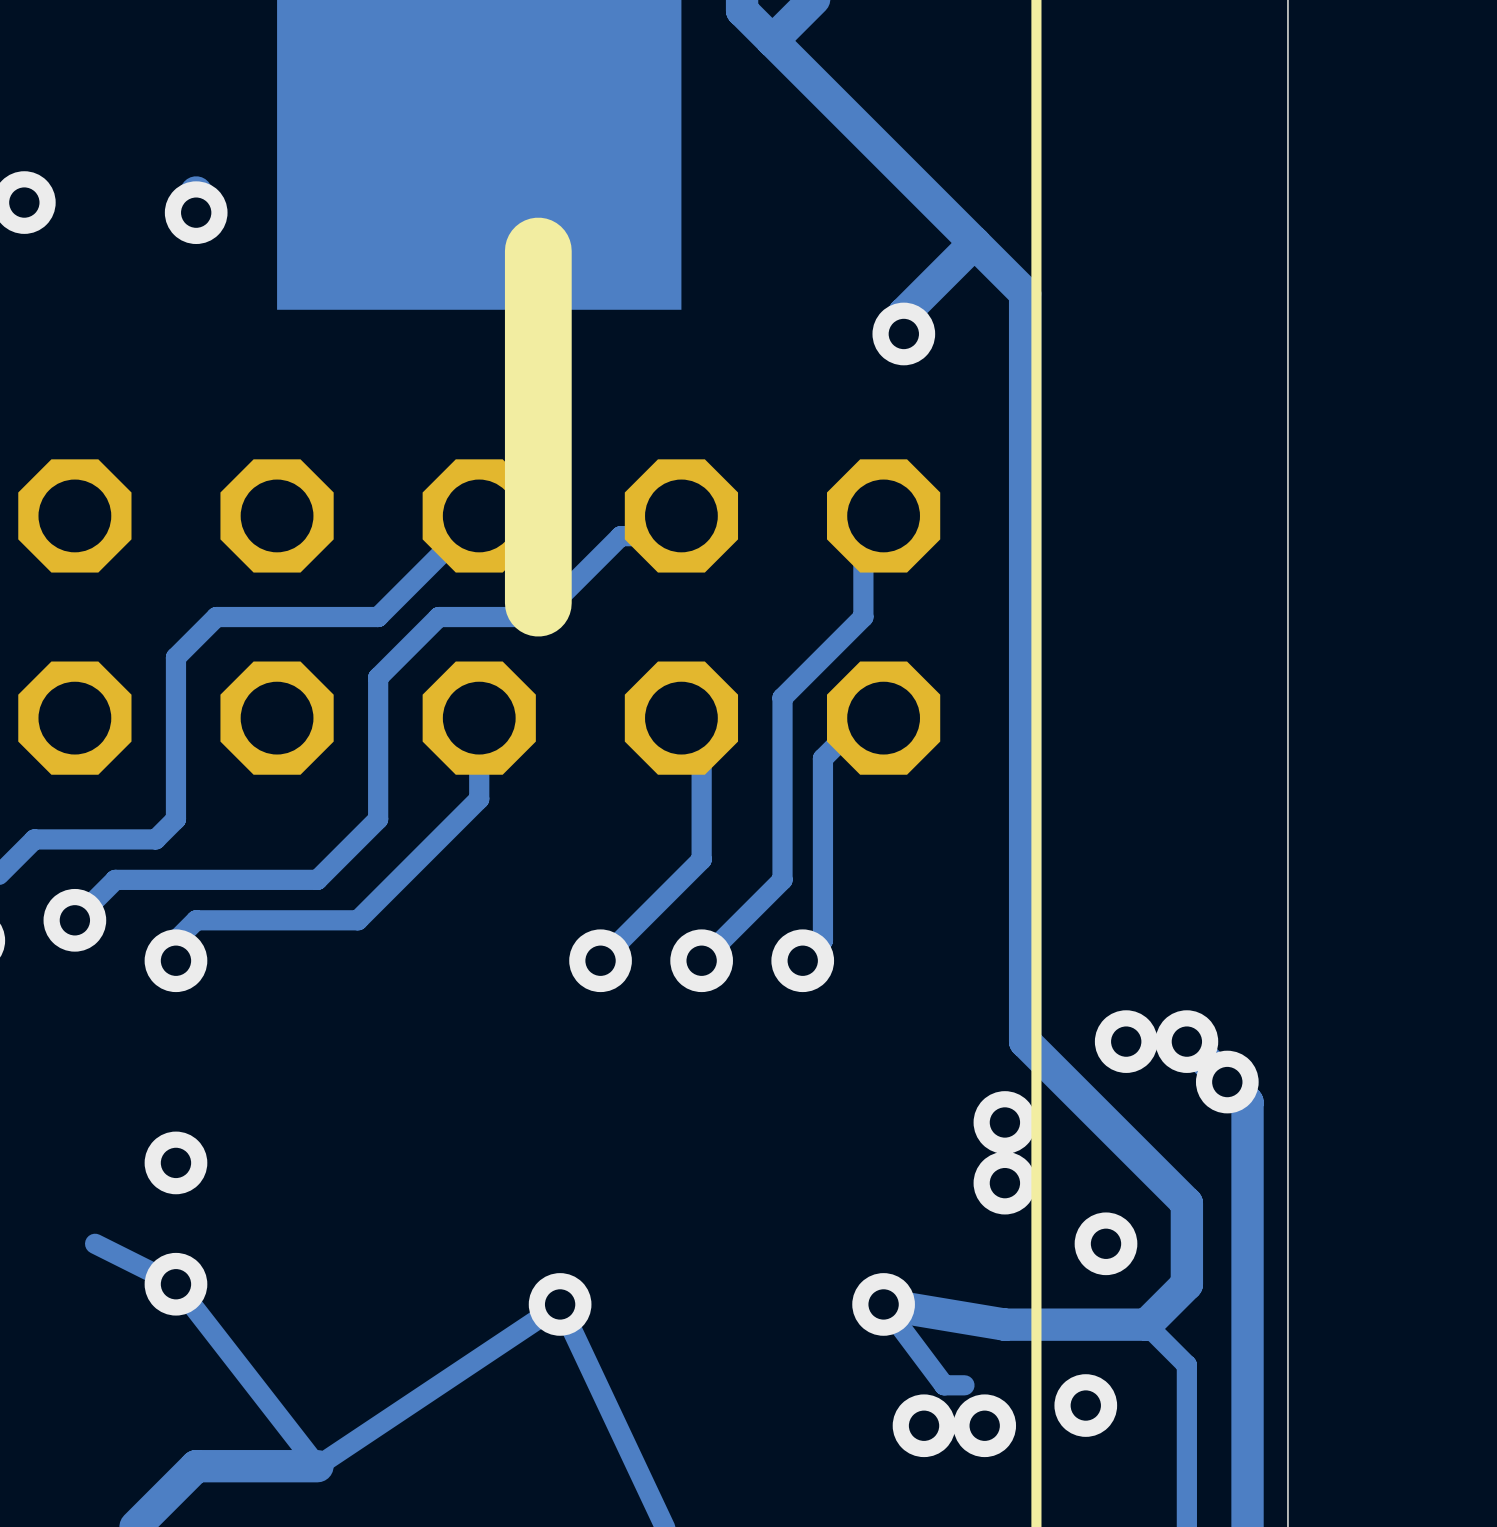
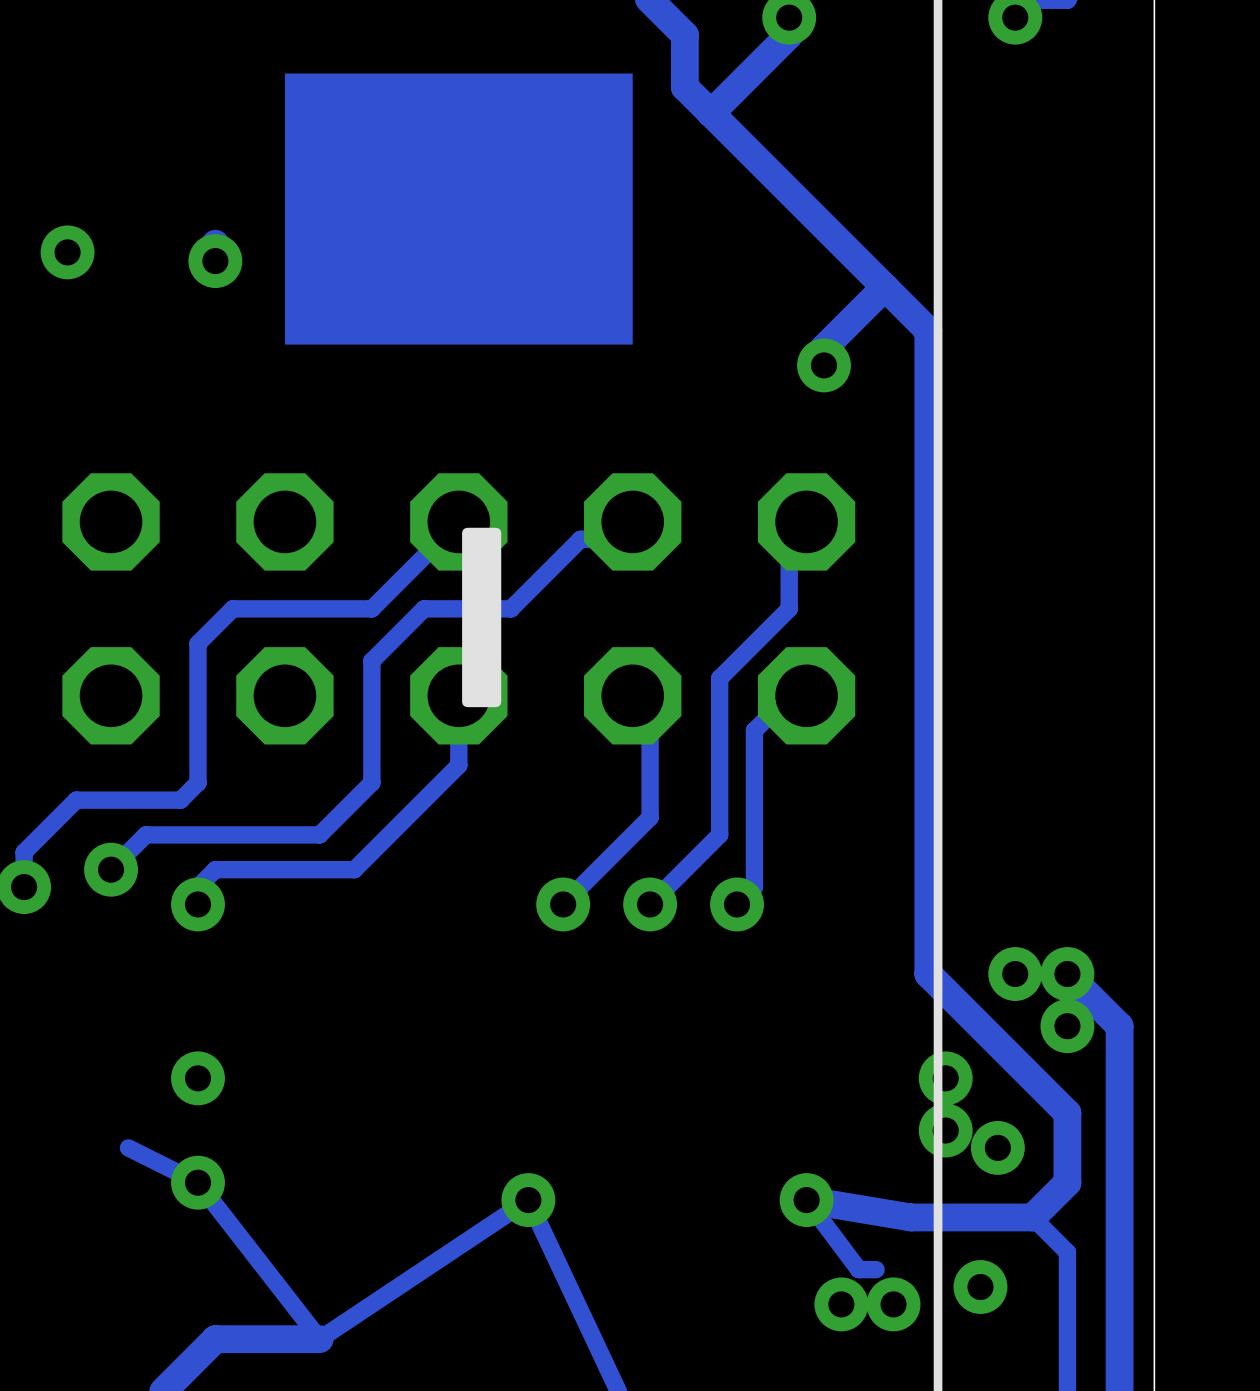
via position: (1227, 1082) -> (1067, 1026)
via: (1004, 1122) -> none
via: none -> (945, 1078)
via: (1004, 1183) -> none
via: none -> (945, 1130)

